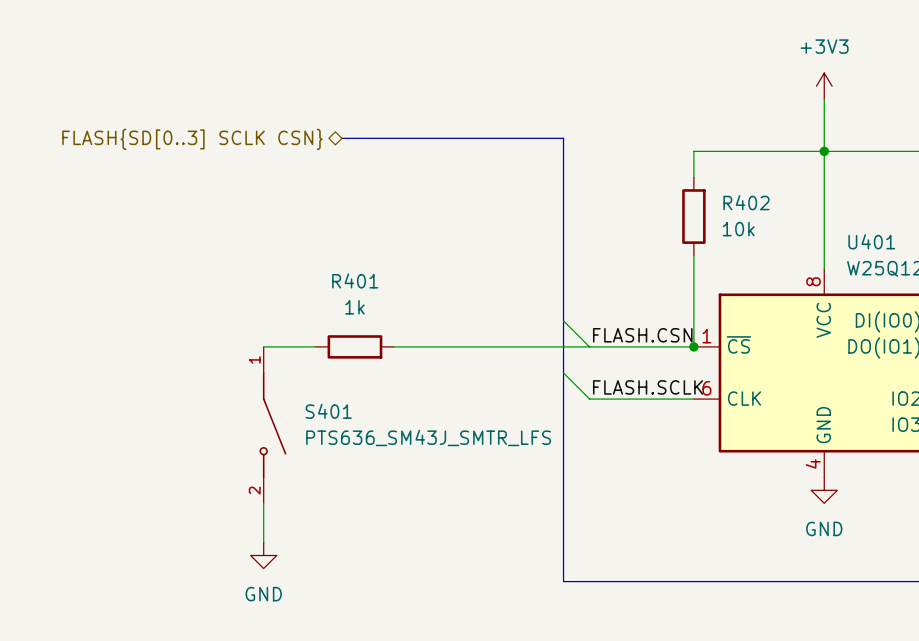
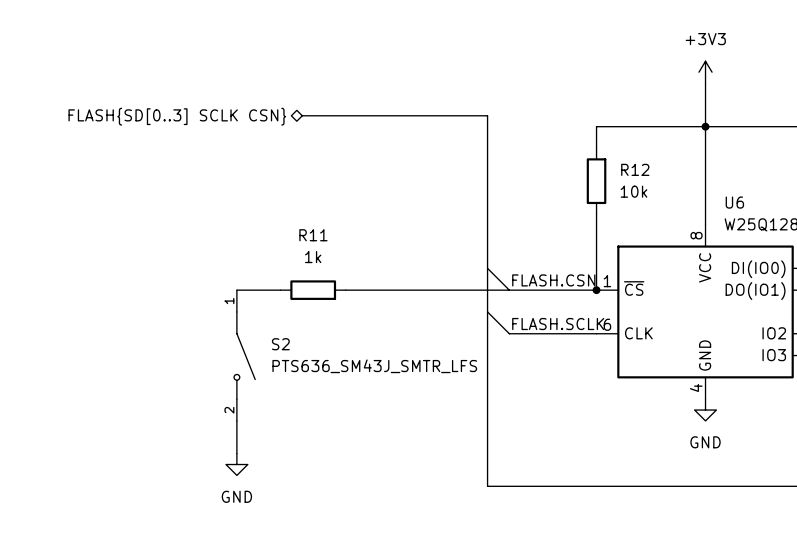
R402 name: R402 (746, 202) -> R12 (635, 169)
U401 name: U401 (871, 241) -> U6 (734, 202)
R401 name: R401 (355, 280) -> R11 (313, 235)
S401 name: S401 (328, 411) -> S2 (280, 344)

